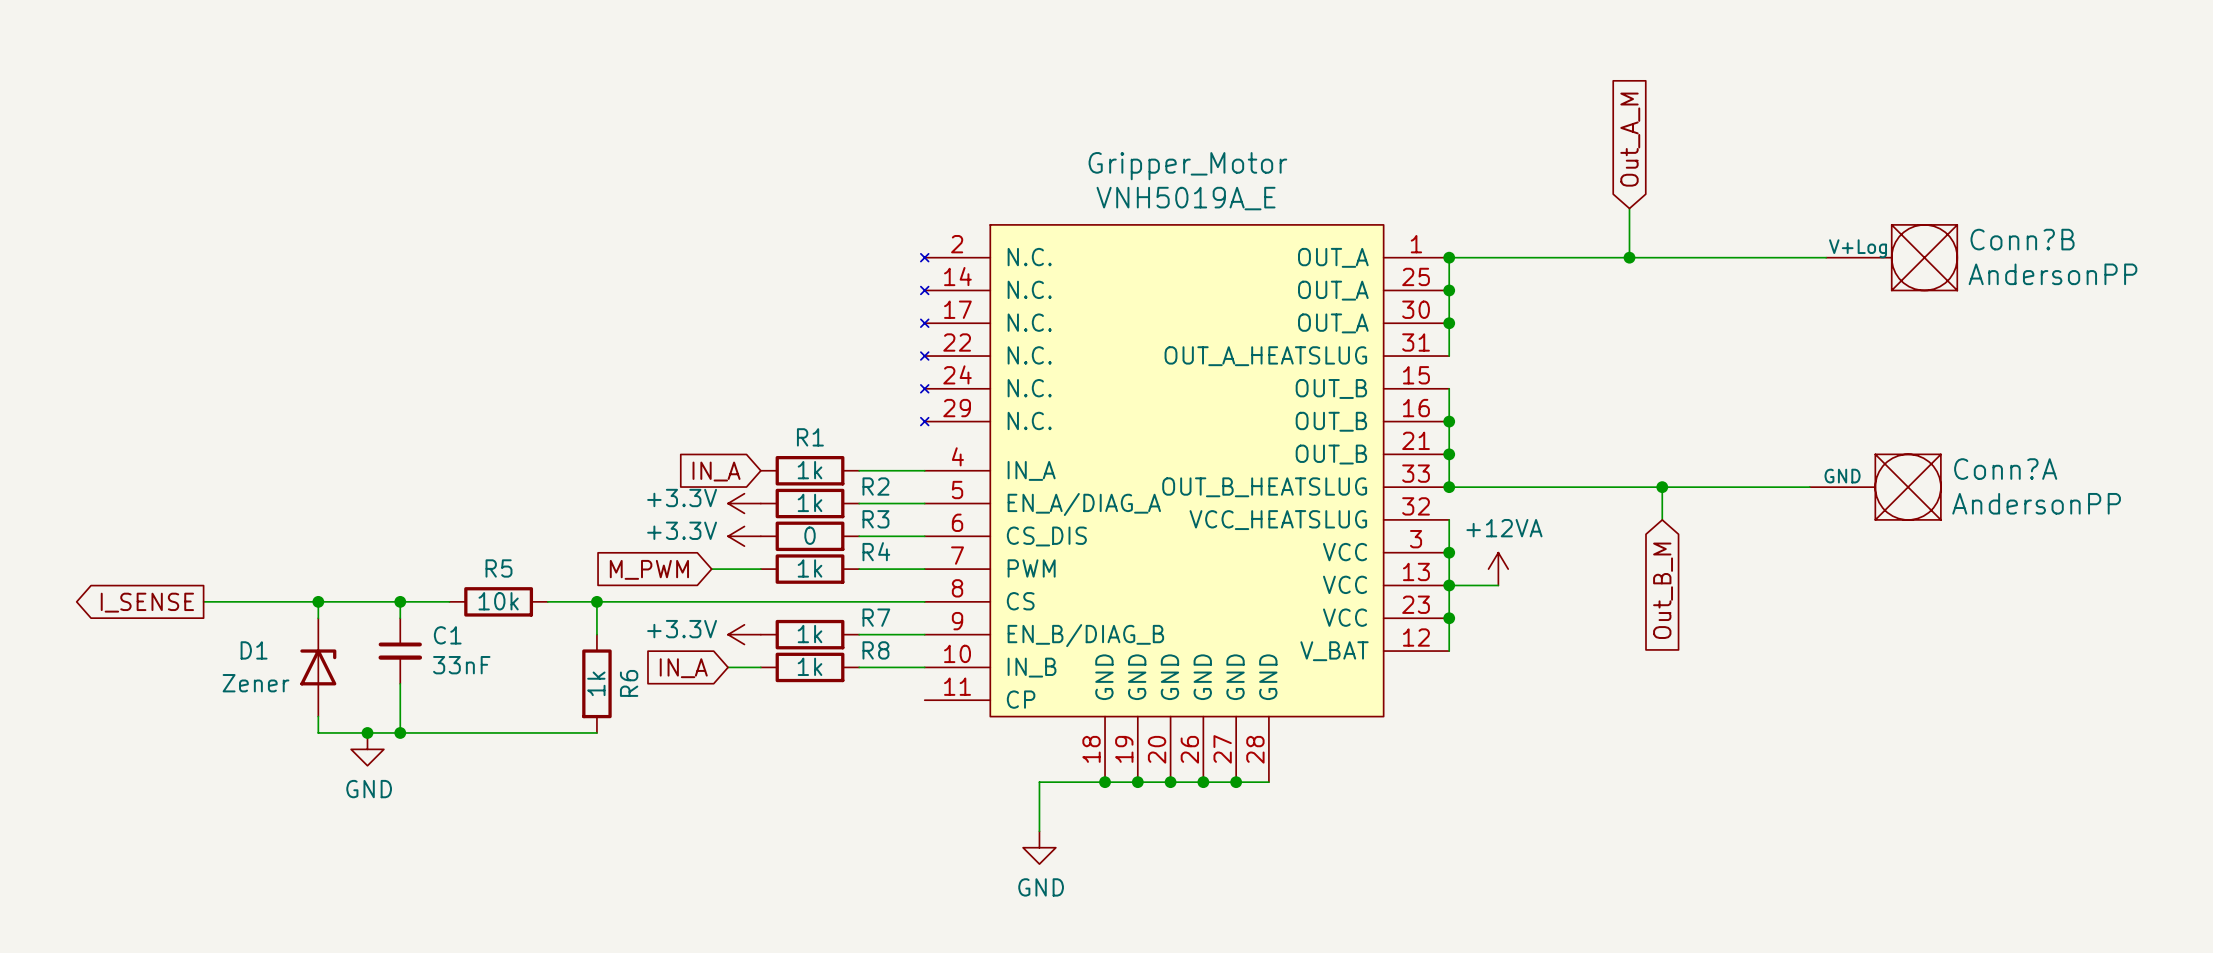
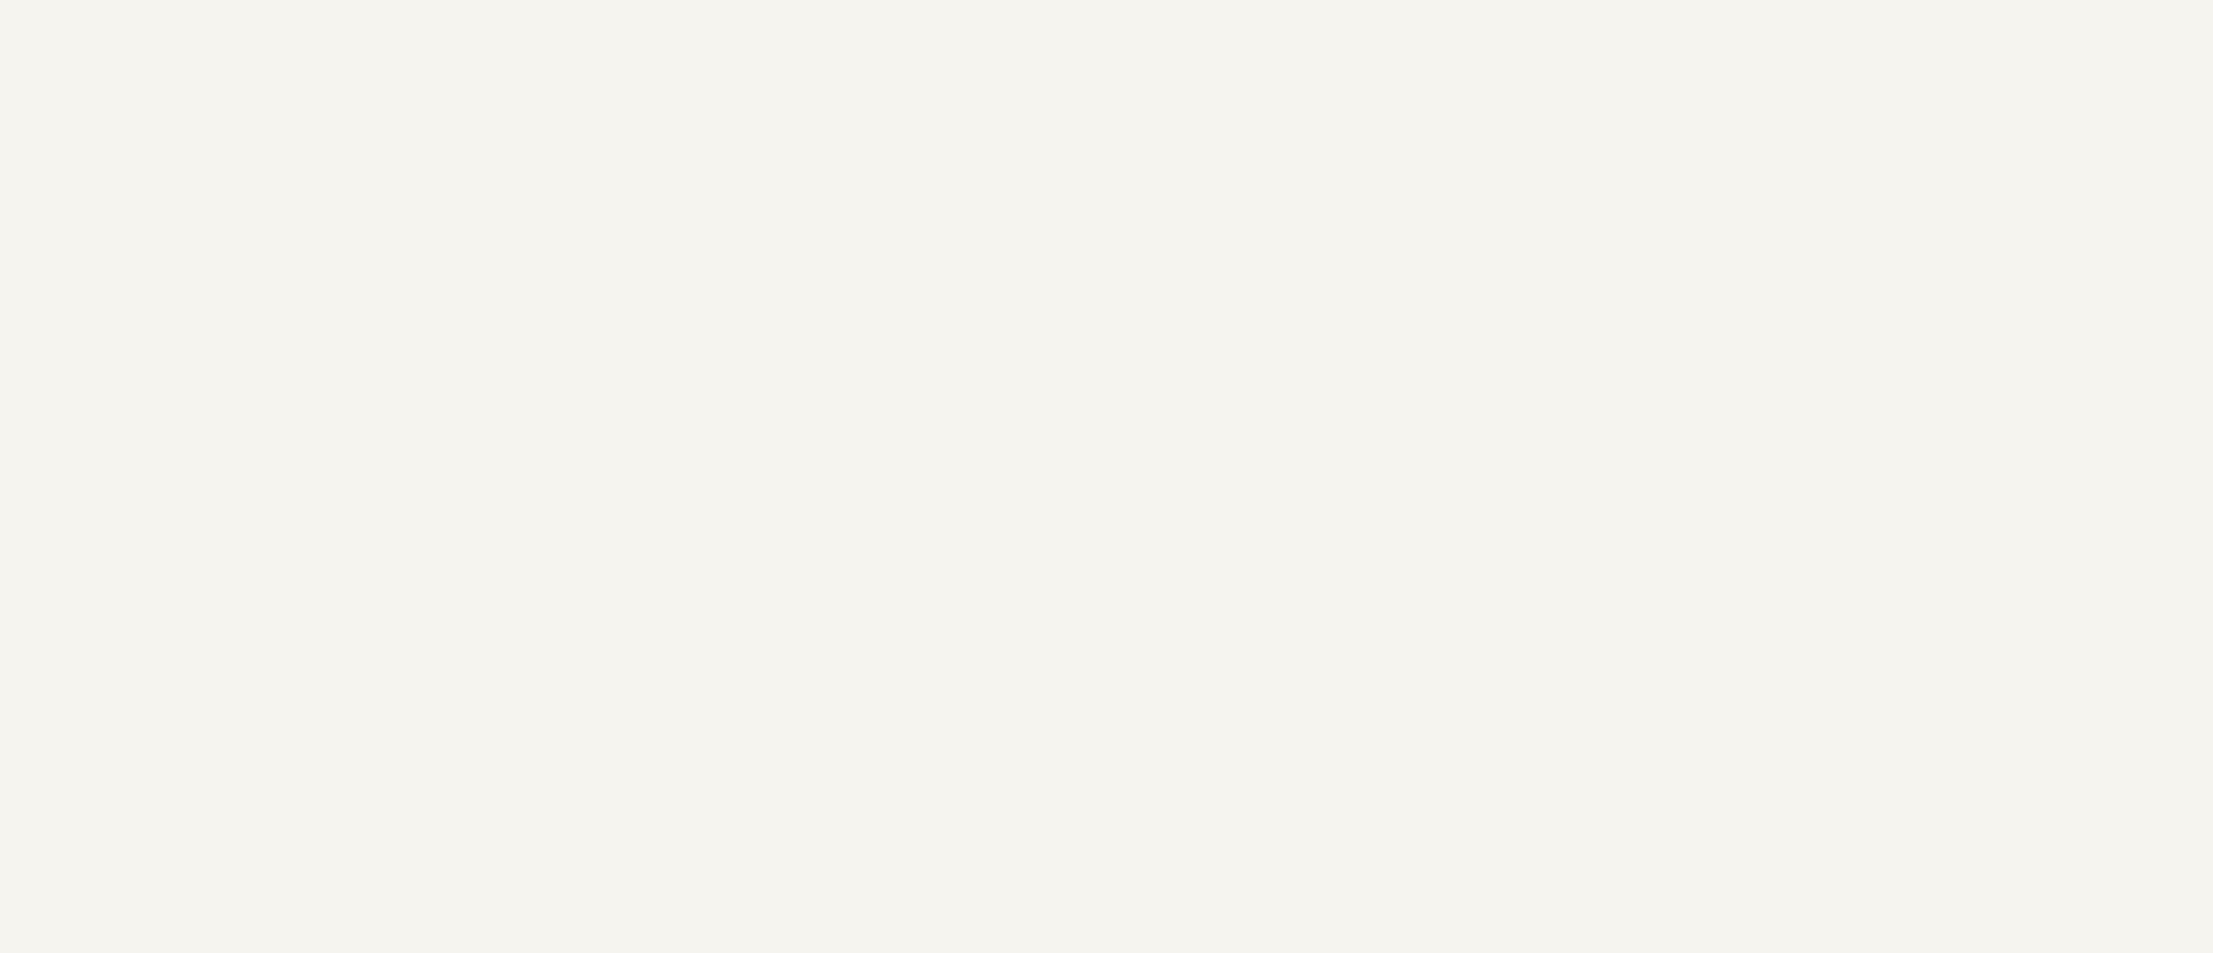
global label: Out_A_M (1630, 139) -> none
wire: (1629, 208) (1629, 257) -> none
junction: (1449, 257) -> none
junction: (1629, 257) -> none
wire: (1826, 257) (1449, 257) (1449, 356) -> none
Conn?B: AndersonPP (1891, 257) -> none
junction: (1449, 290) -> none
junction: (1449, 323) -> none
wire: (1449, 388) (1449, 487) (1809, 487) -> none
junction: (1449, 421) -> none
junction: (1449, 454) -> none
R1: 1k (810, 470) -> none
wire: (859, 470) (924, 470) -> none
global label: IN_A (716, 471) -> none
junction: (1449, 487) -> none
wire: (1662, 487) (1662, 519) -> none
junction: (1662, 487) -> none
Conn?A: AndersonPP (1875, 487) -> none
power symbol: +3.3V (744, 503) -> none
R2: 1k (810, 503) -> none
wire: (859, 503) (924, 503) -> none
Gripper_Motor: VNH5019A_E (1185, 503) -> none
wire: (1449, 519) (1449, 651) -> none
power symbol: +3.3V (744, 536) -> none
R3: 0 (810, 536) -> none
wire: (859, 536) (924, 536) -> none
junction: (1449, 552) -> none
global label: M_PWM (649, 569) -> none
wire: (711, 569) (760, 569) -> none
R4: 1k (810, 569) -> none
wire: (859, 569) (924, 569) -> none
power symbol: +12VA (1498, 569) -> none
wire: (1449, 585) (1498, 585) -> none
junction: (1449, 585) -> none
global label: Out_B_M (1663, 590) -> none
wire: (203, 601) (449, 601) -> none
wire: (318, 601) (318, 618) -> none
junction: (318, 601) -> none
wire: (400, 601) (400, 618) -> none
junction: (400, 601) -> none
R5: 10k (498, 601) -> none
wire: (547, 601) (924, 601) -> none
wire: (596, 601) (596, 634) -> none
junction: (596, 601) -> none
global label: I_SENSE (147, 602) -> none
junction: (1449, 618) -> none
power symbol: +3.3V (744, 634) -> none
R7: 1k (810, 634) -> none
wire: (859, 634) (924, 634) -> none
C1: 33nF (400, 651) -> none
D1: Zener (318, 667) -> none
wire: (728, 667) (760, 667) -> none
R8: 1k (810, 667) -> none
wire: (859, 667) (924, 667) -> none
global label: IN_A (683, 668) -> none
wire: (400, 683) (400, 732) -> none
R6: 1k (596, 683) -> none
wire: (318, 716) (318, 732) (596, 732) -> none
junction: (367, 732) -> none
junction: (400, 732) -> none
power symbol: GND (367, 749) -> none
junction: (1105, 782) -> none
junction: (1137, 782) -> none
junction: (1170, 782) -> none
junction: (1203, 782) -> none
junction: (1236, 782) -> none
wire: (1268, 782) (1039, 782) (1039, 831) -> none
power symbol: GND (1039, 847) -> none

